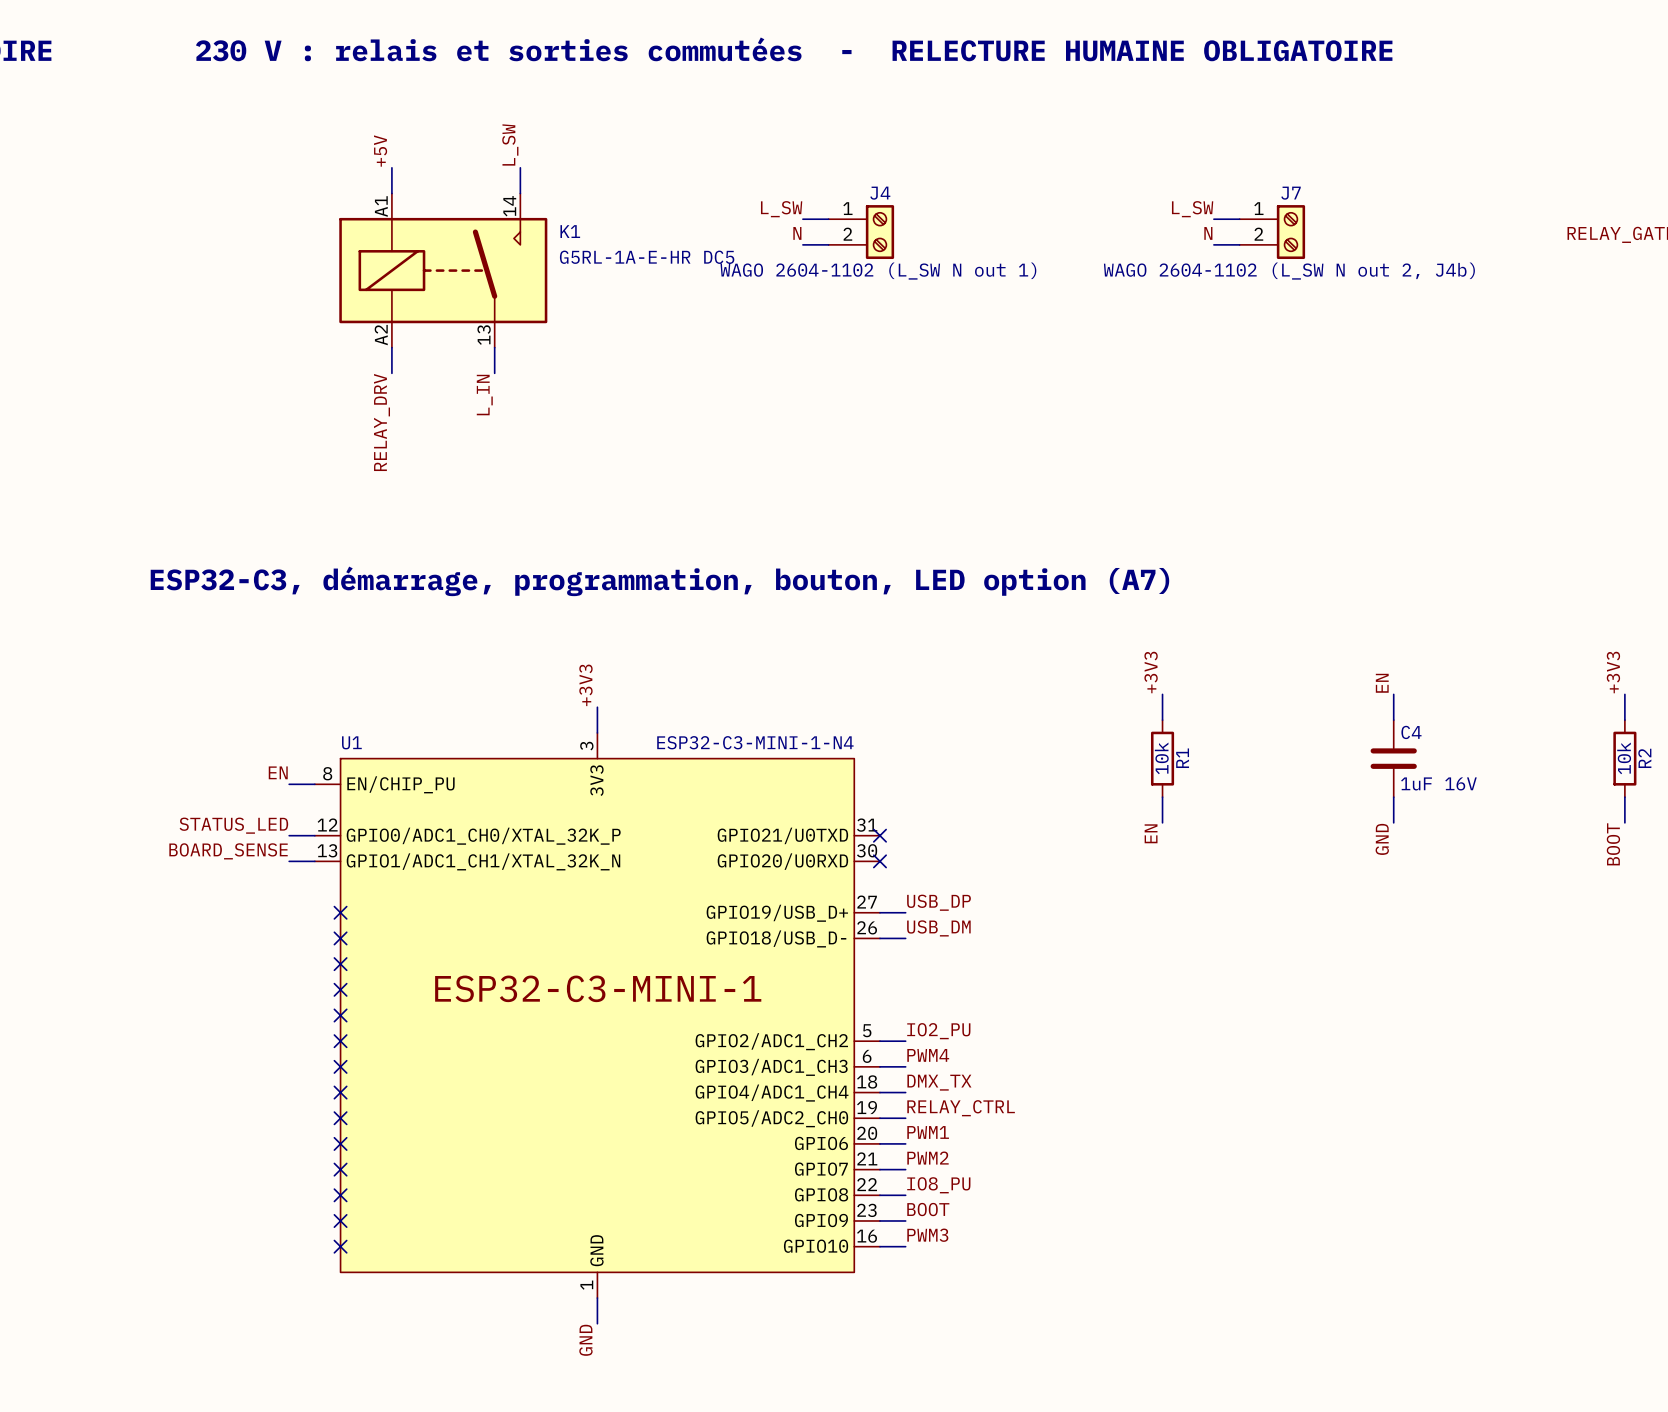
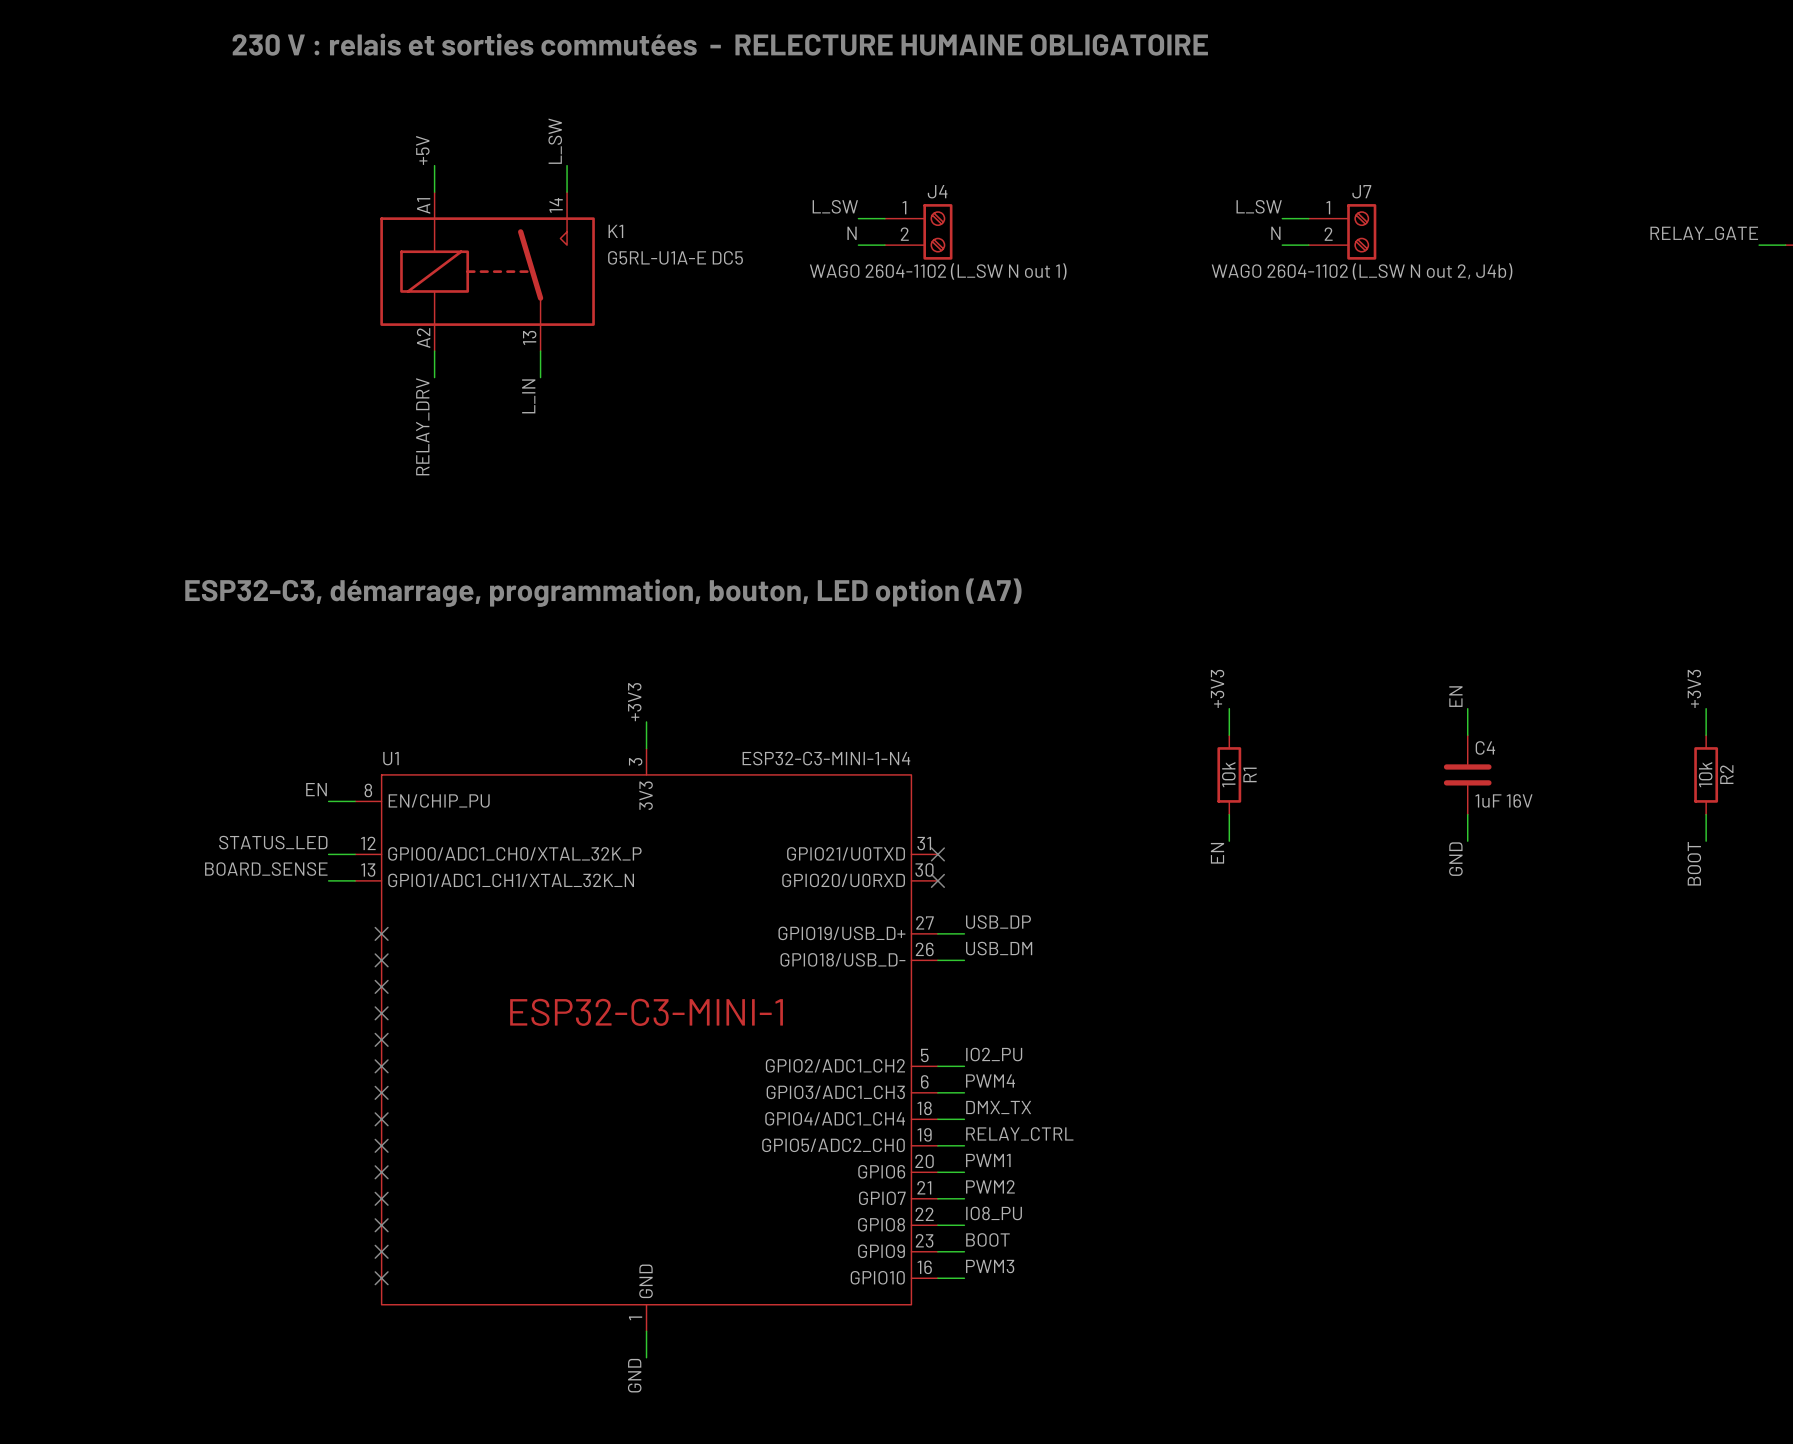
K1 value: G5RL-1A-E-HR DC5 (647, 257) -> G5RL-U1A-E DC5 (675, 257)

